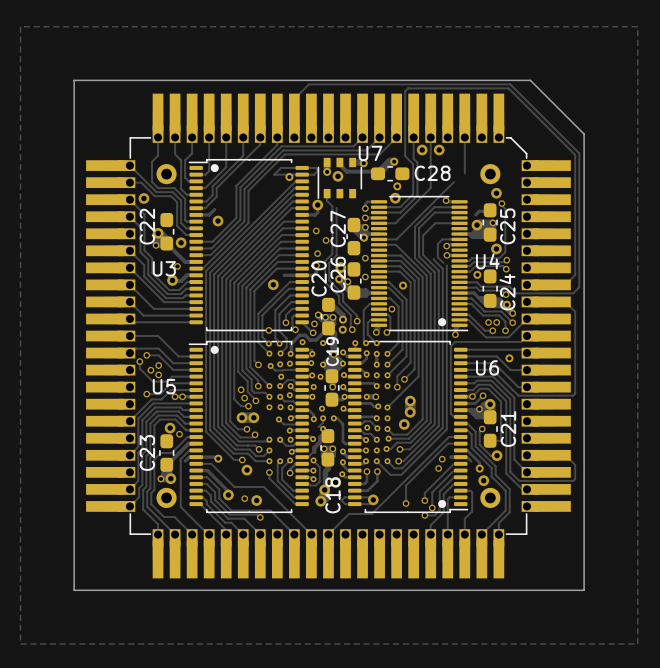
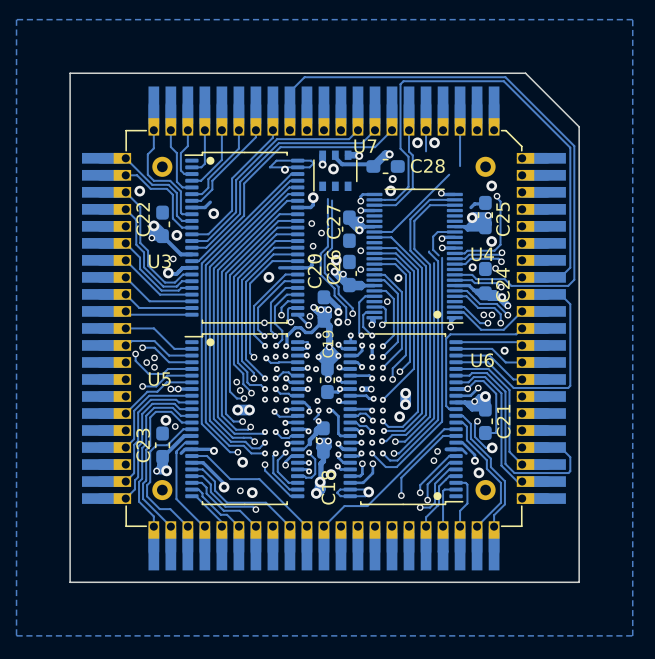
track: (430, 158) (430, 188) (395, 223) (379, 223) -> none
track: (327, 193) (327, 201) (332, 206) -> none
track: (459, 223) (435, 223) (423, 235) (423, 254) (438, 270) -> none
via: none -> (495, 268)

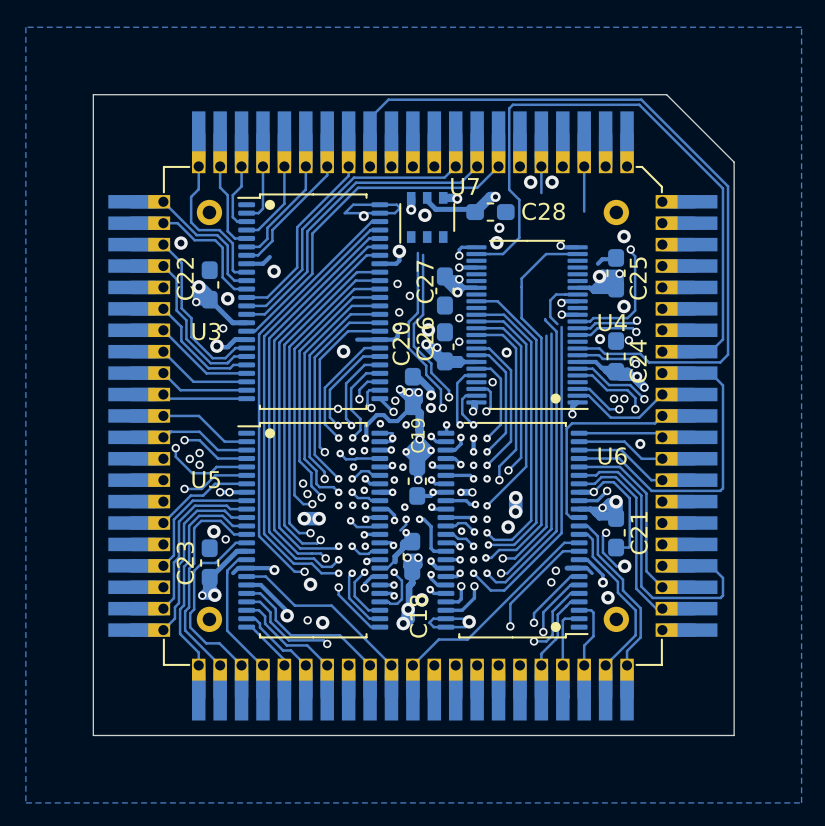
track: (409, 130) (409, 151) (412, 155) (412, 188) (395, 205) (374, 205) -> none
track: (449, 174) (391, 231) (374, 231) -> none
track: (454, 205) (430, 205) (414, 220) (414, 249) (430, 264) -> none

